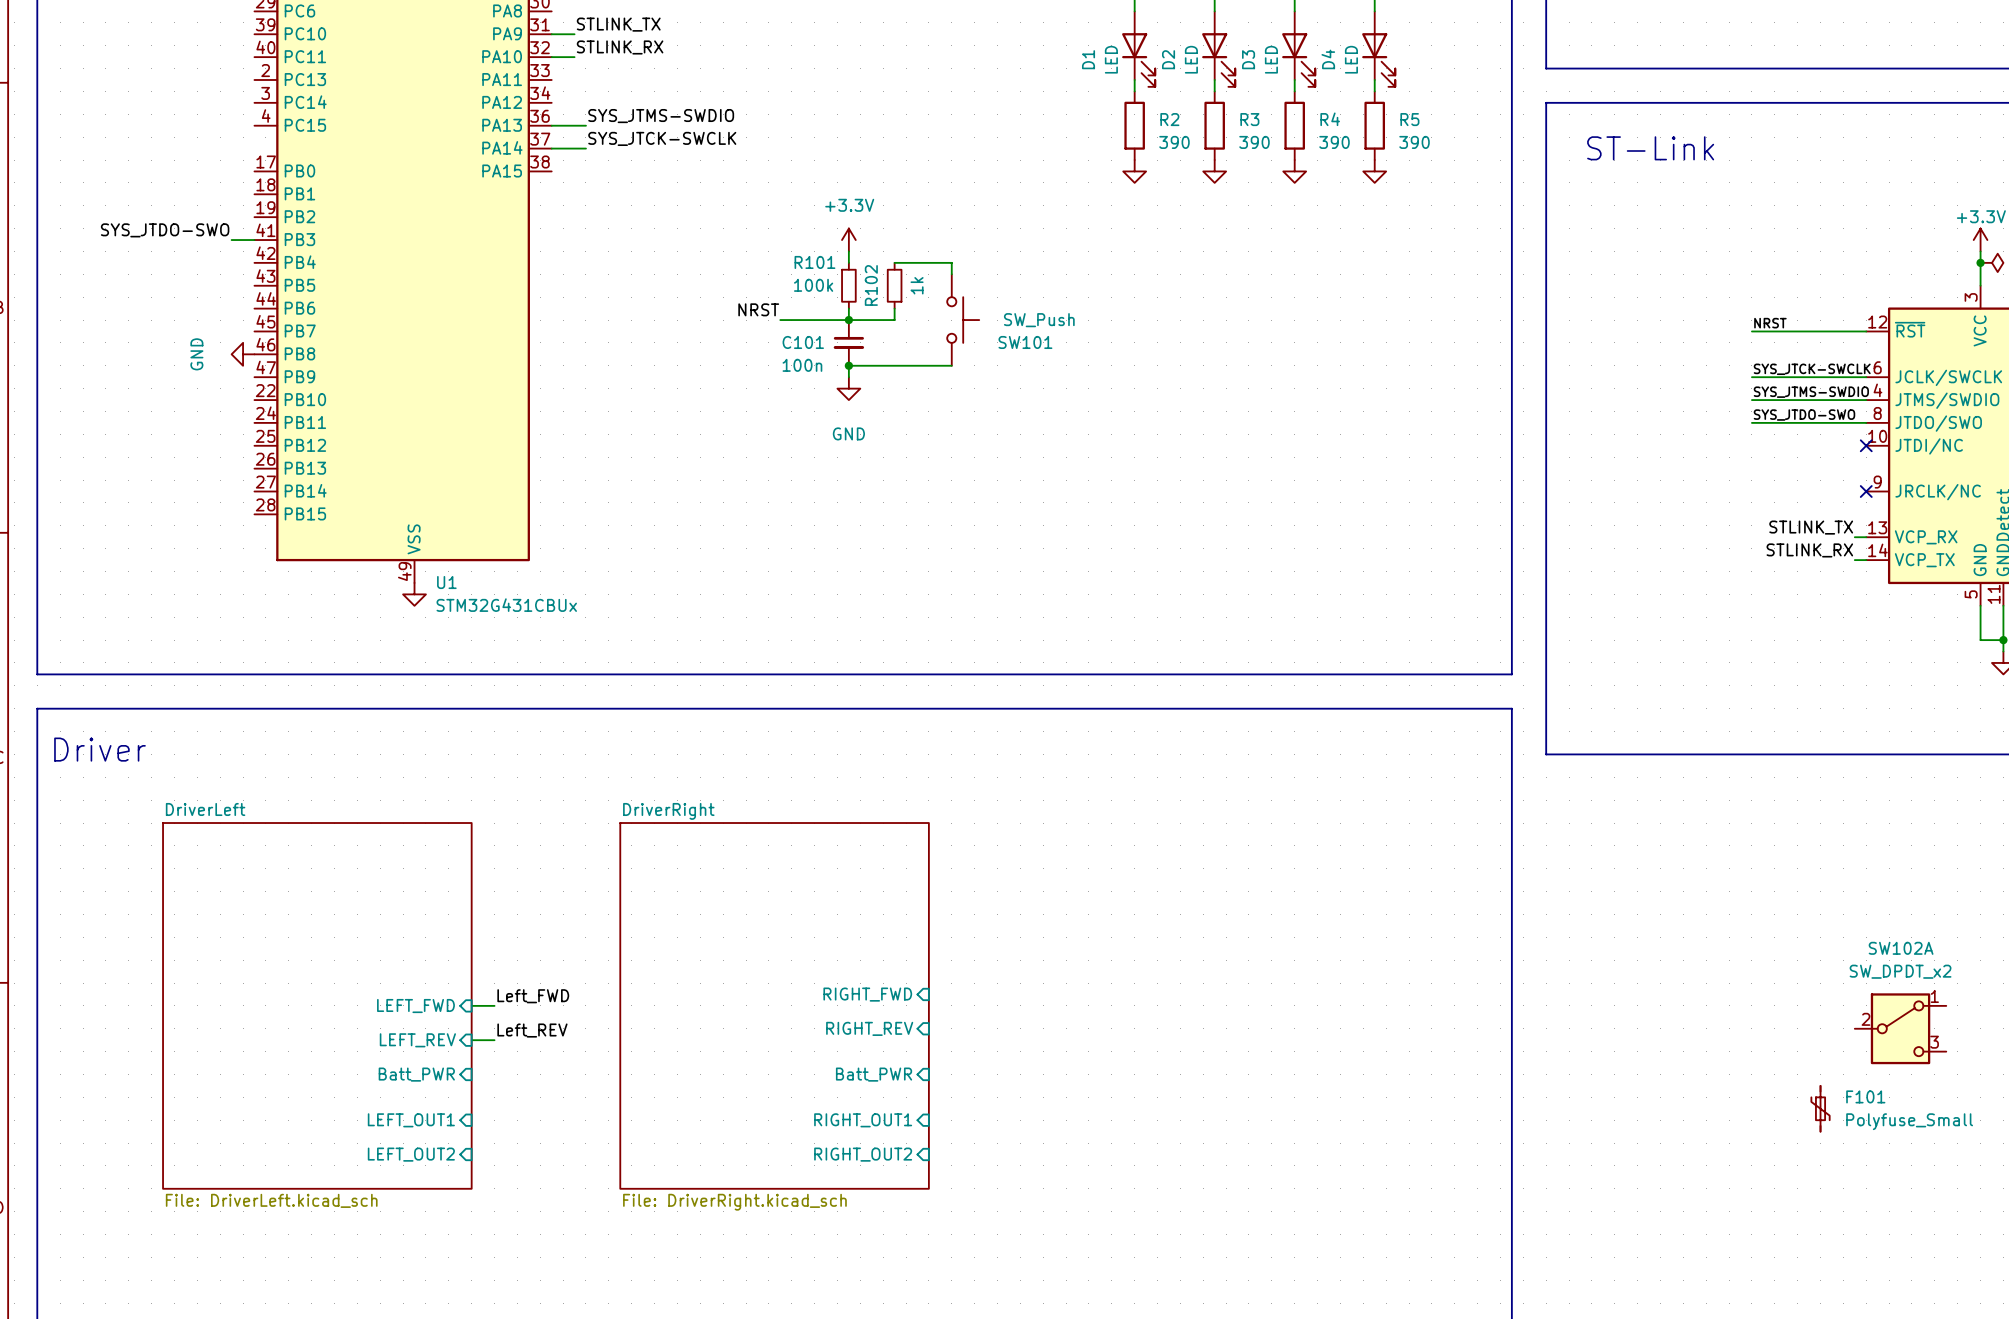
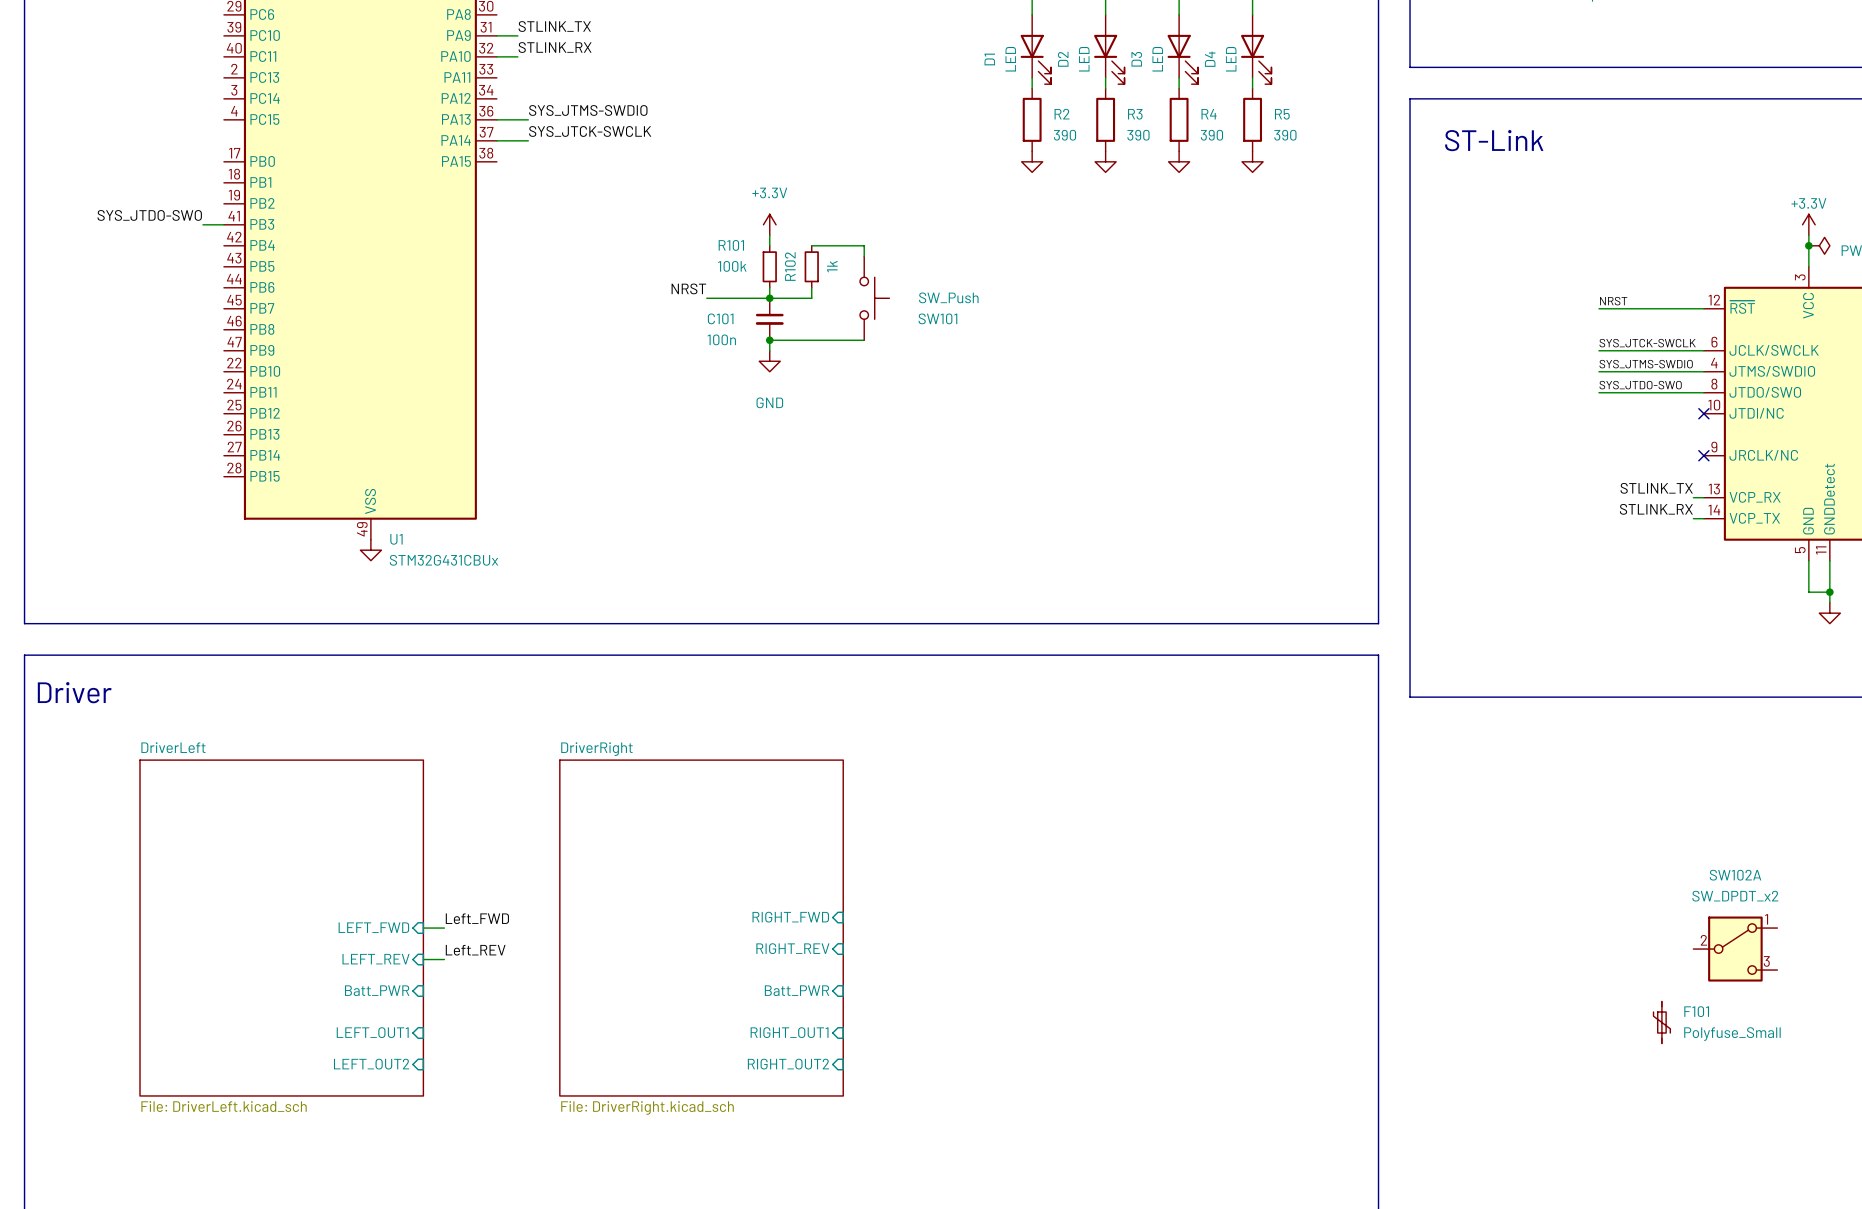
power symbol: GND (243, 354) -> none

